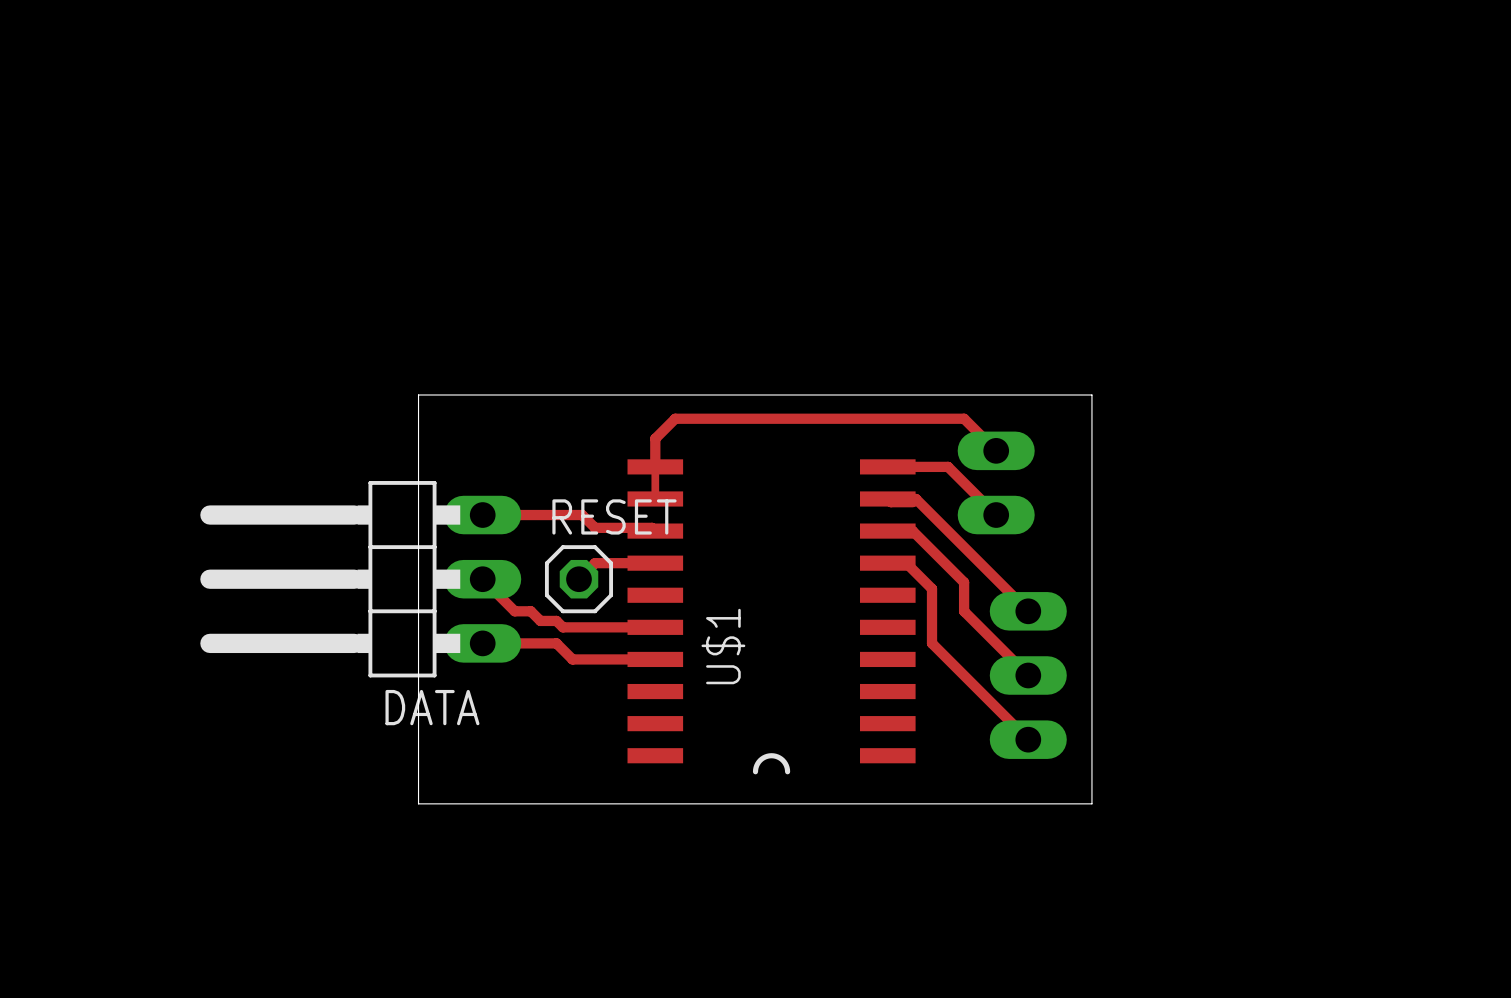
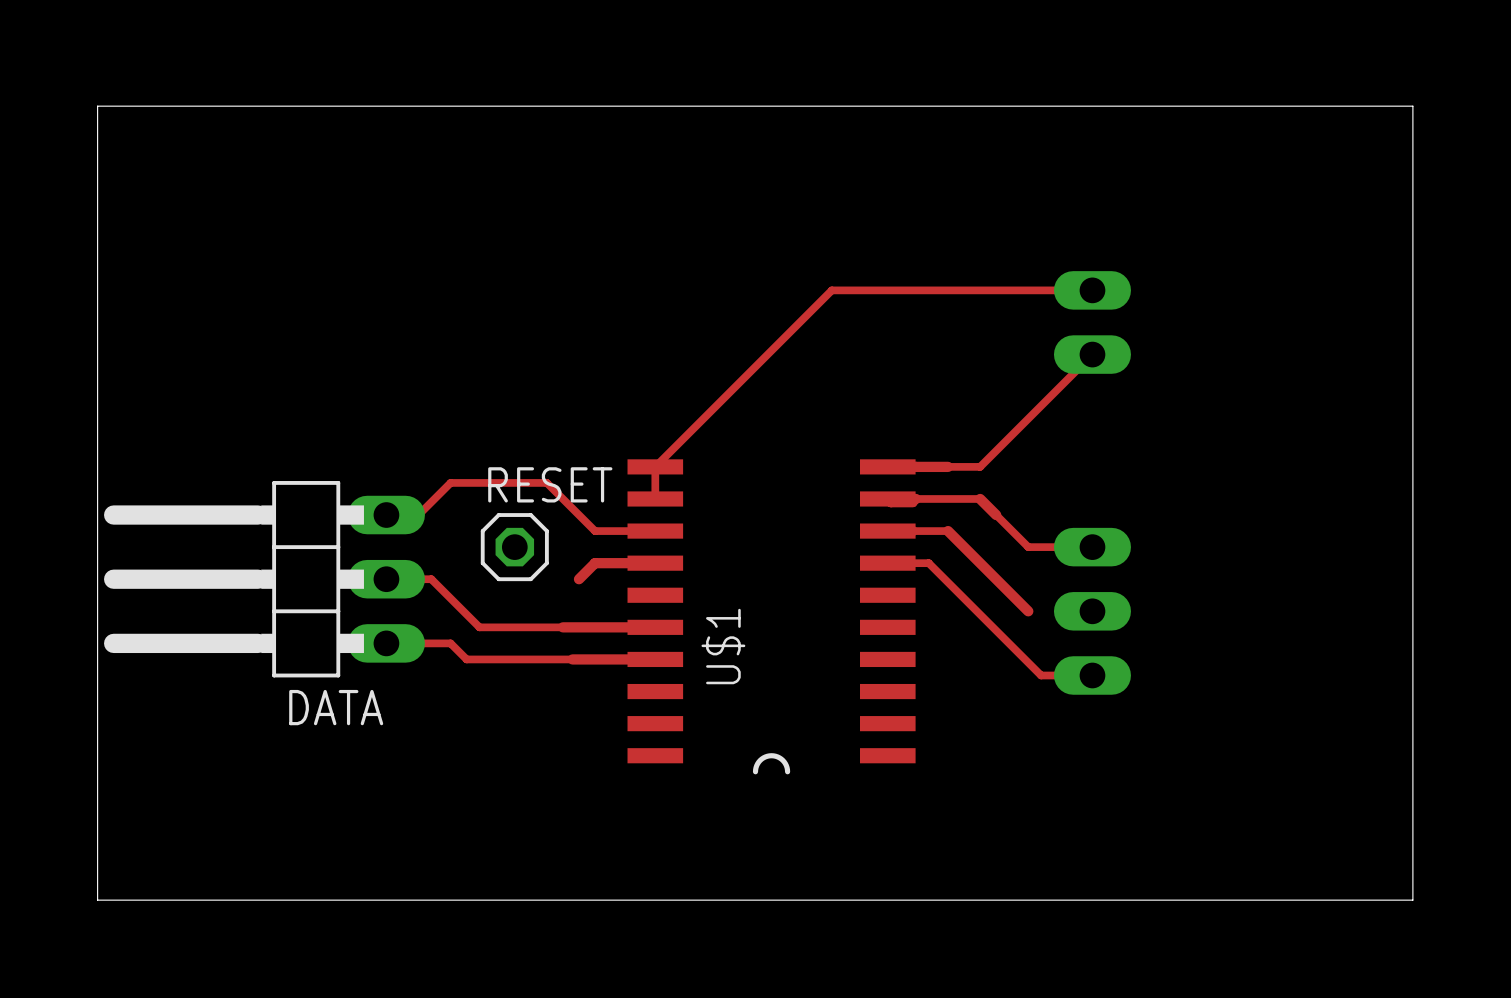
board edge: none -> (97, 106) (1412, 106) (1412, 900) (97, 900) (97, 106)
track: none -> (1092, 354) (980, 466) (948, 466)
board edge: (418, 394) (1091, 394) (1091, 803) (418, 803) (418, 394) -> none
track: (996, 450) (964, 418) (675, 418) (655, 438) (655, 466) -> (1092, 290) (831, 290) (655, 466)
track: (948, 466) (980, 498) -> (915, 498) (980, 498)
part position: (996, 482) -> (1092, 322)
track: (915, 498) (948, 531) -> (912, 531) (948, 531)
track: (482, 515) (582, 515) (595, 527) (652, 527) (655, 531) -> (386, 515) (418, 515) (450, 482) (546, 482) (595, 531) (655, 531)
track: none -> (996, 515) (1028, 547) (1092, 547)
track: (912, 531) (964, 582) (964, 611) (1028, 675) -> none
track: (906, 563) (932, 588) (932, 643) (1028, 739) -> (906, 563) (928, 563) (1041, 675) (1092, 675)
DATA position: (360, 579) -> (264, 579)
track: (482, 579) (514, 611) (530, 611) (540, 620) (556, 620) (562, 627) -> (386, 579) (431, 579) (479, 627) (562, 627)
RESET position: (578, 579) -> (514, 547)
track: (482, 643) (556, 643) (572, 659) -> (386, 643) (450, 643) (466, 659) (572, 659)
part position: (1028, 675) -> (1092, 611)

